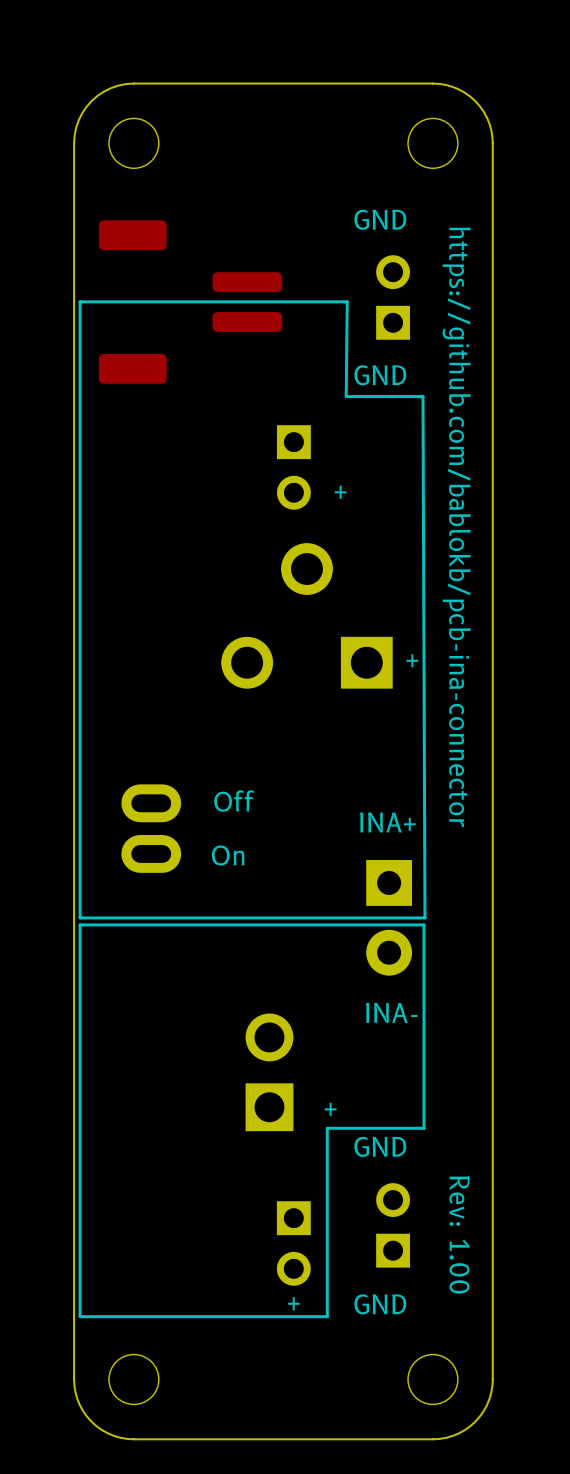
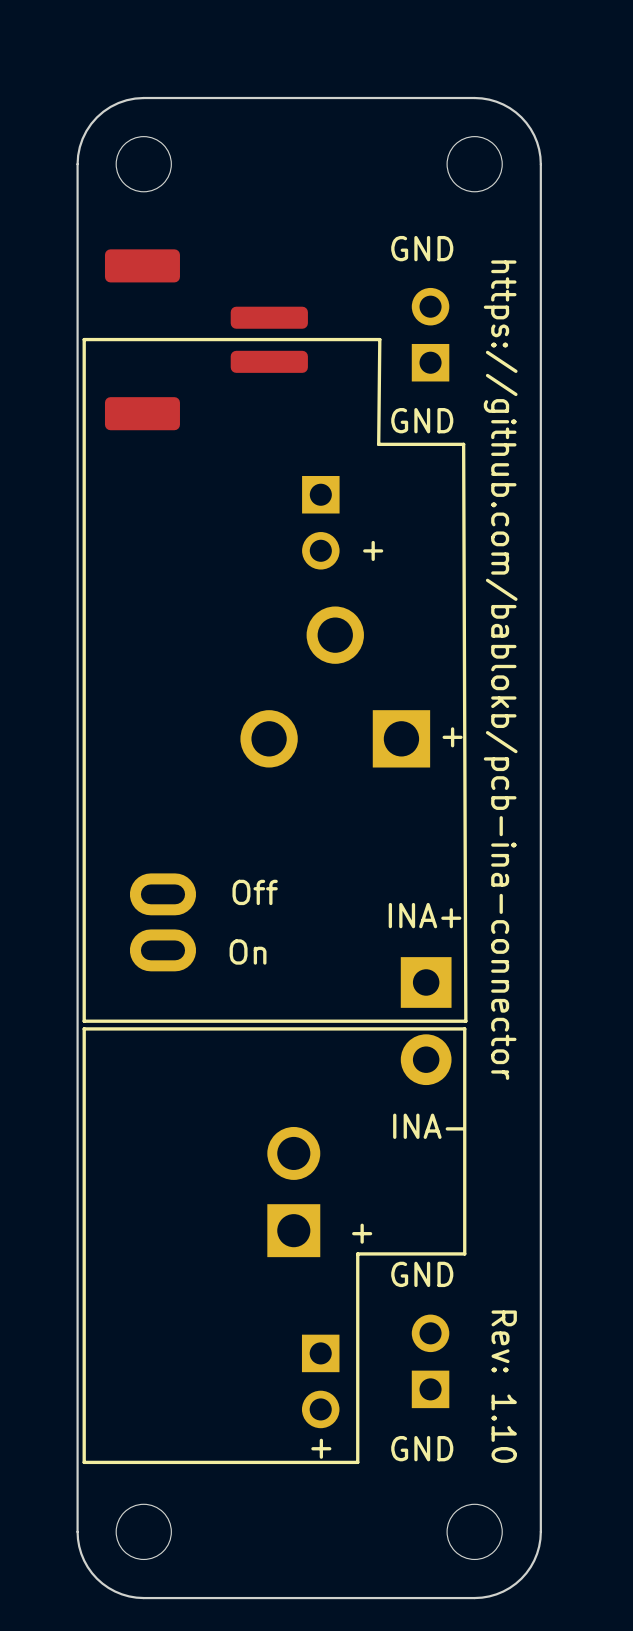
text: Rev: 1.00 (459, 1234) -> Rev: 1.10 (504, 1386)

